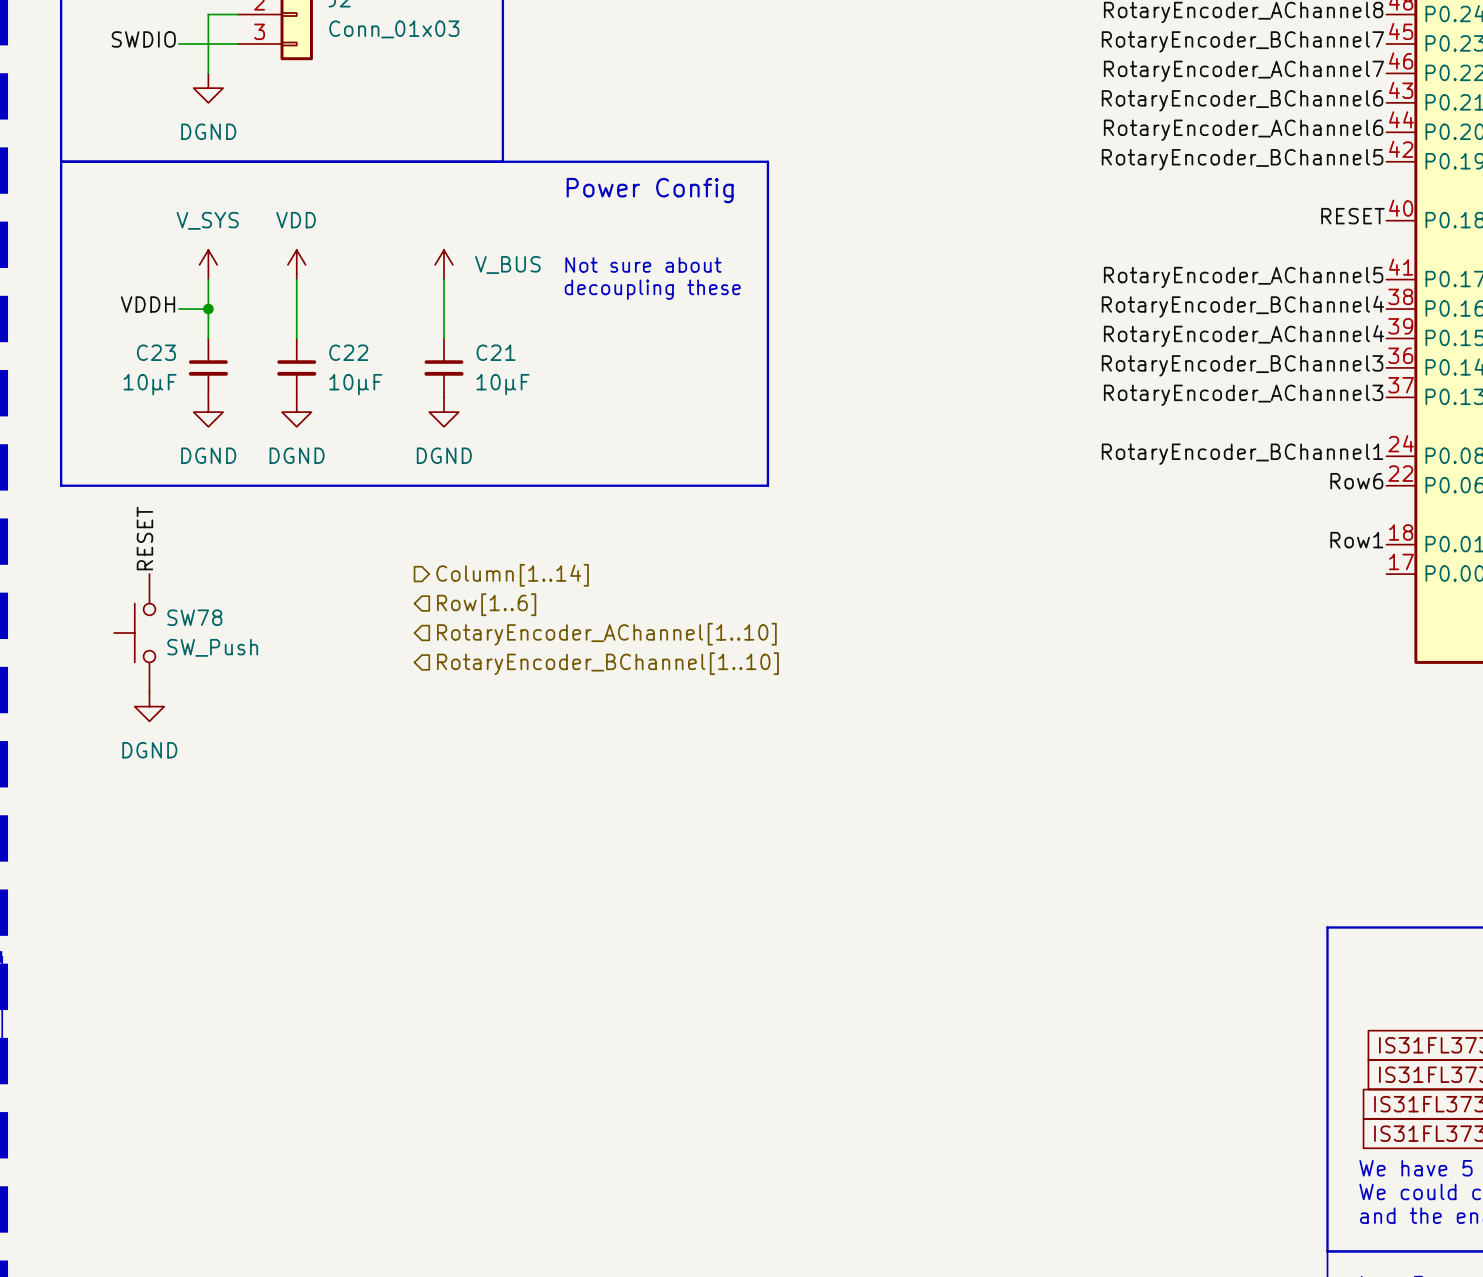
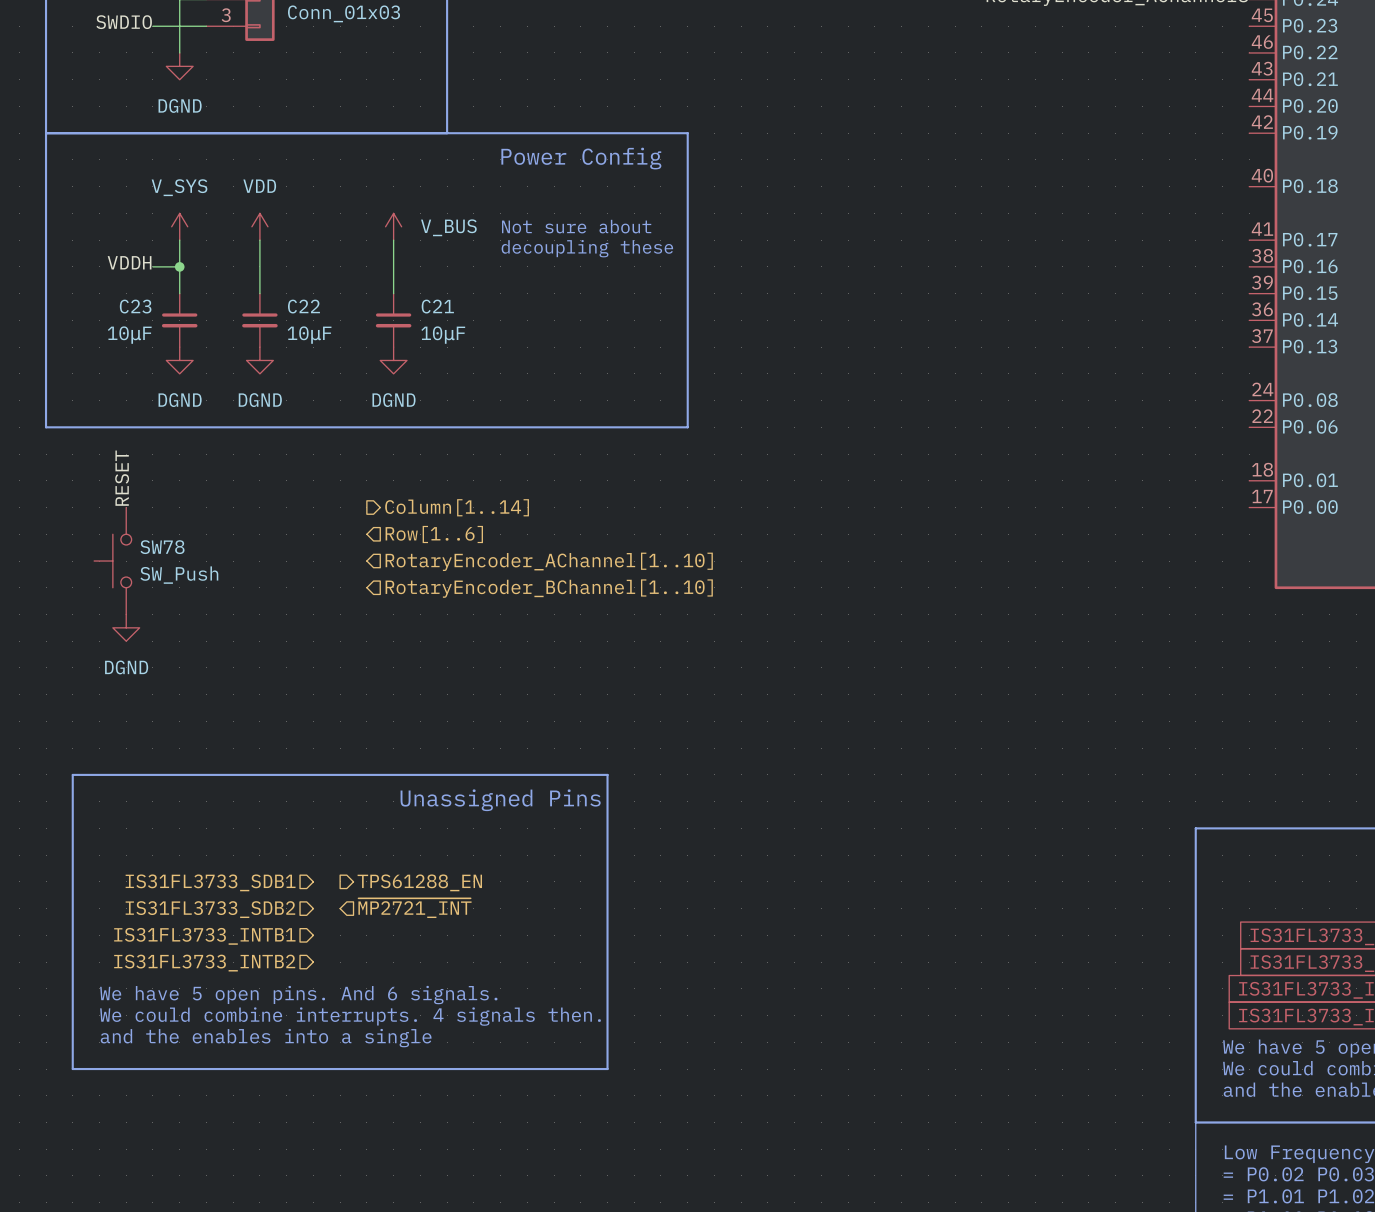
label: RotaryEncoder_BChannel7 (1242, 41) -> none
label: RotaryEncoder_AChannel7 (1243, 71) -> none
label: RotaryEncoder_BChannel6 (1242, 100) -> none
label: RotaryEncoder_AChannel6 (1243, 130) -> none
label: RotaryEncoder_BChannel5 (1242, 159) -> none
label: RESET (1352, 216) -> none
label: RotaryEncoder_AChannel5 (1243, 277) -> none
label: RotaryEncoder_BChannel4 (1242, 306) -> none
label: RotaryEncoder_AChannel4 (1243, 336) -> none
label: RotaryEncoder_BChannel3 (1242, 365) -> none
label: RotaryEncoder_AChannel3 (1243, 395) -> none
label: RotaryEncoder_BChannel1 (1242, 454) -> none
label: Row6 (1356, 481) -> none
label: Row1 (1356, 540) -> none
line: none -> (72, 774) (607, 774) (607, 1069) (72, 1069) (72, 774)
text: none -> Unassigned Pins (500, 800)
hierarchical label: none -> IS31FL3733_SDB1 (210, 882)
hierarchical label: none -> TPS61288_EN (419, 882)
hierarchical label: none -> ~{MP2721_INT} (414, 908)
hierarchical label: none -> IS31FL3733_SDB2 (210, 909)
hierarchical label: none -> IS31FL3733_INTB1 (204, 936)
hierarchical label: none -> IS31FL3733_INTB2 (204, 963)
text: none -> We have 5 open pins. And 6 signals. (298, 995)
text: none -> We could combine interrupts. 4 signals then. (350, 1016)
text: none -> and the enables into a single (266, 1038)

